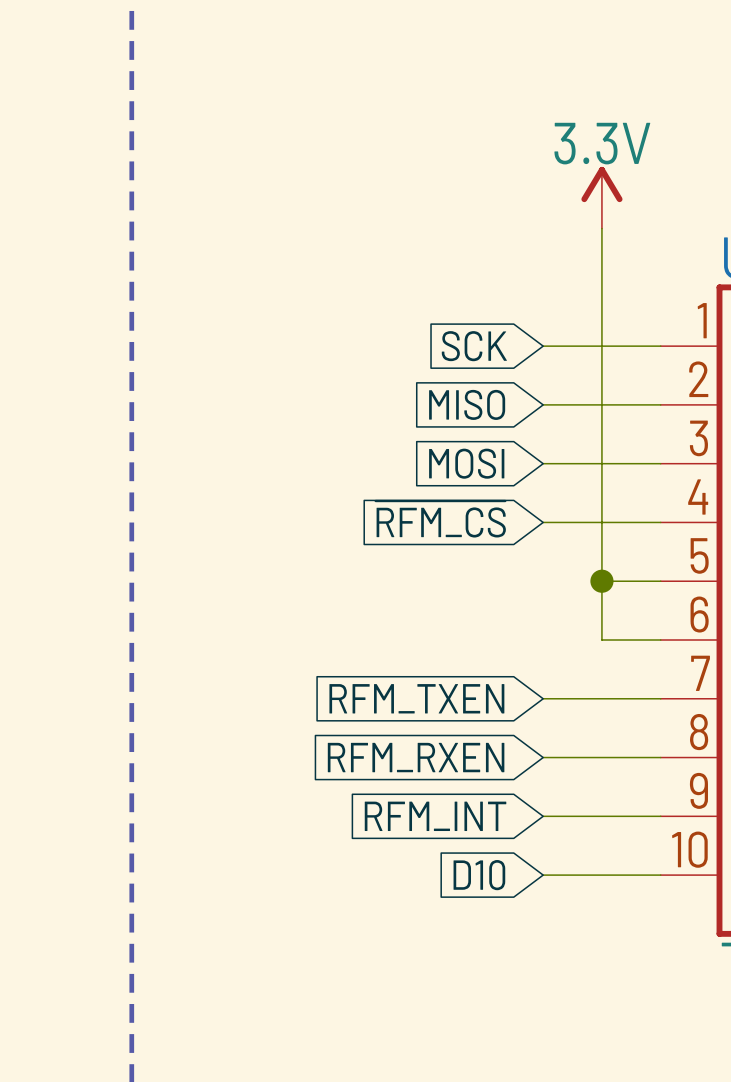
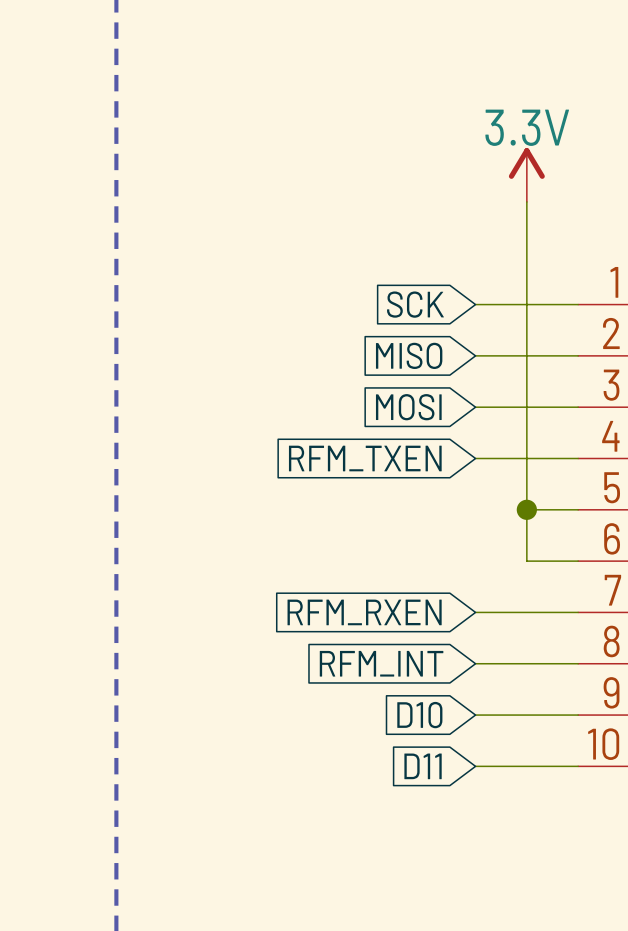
global label: ~{RFM_CS} (440, 519) -> RFM_TXEN (365, 458)
global label: RFM_TXEN (416, 698) -> RFM_RXEN (364, 612)
global label: RFM_RXEN (416, 757) -> RFM_INT (381, 663)
global label: RFM_INT (435, 816) -> D10 (419, 715)
global label: D10 (479, 875) -> D11 (423, 766)

